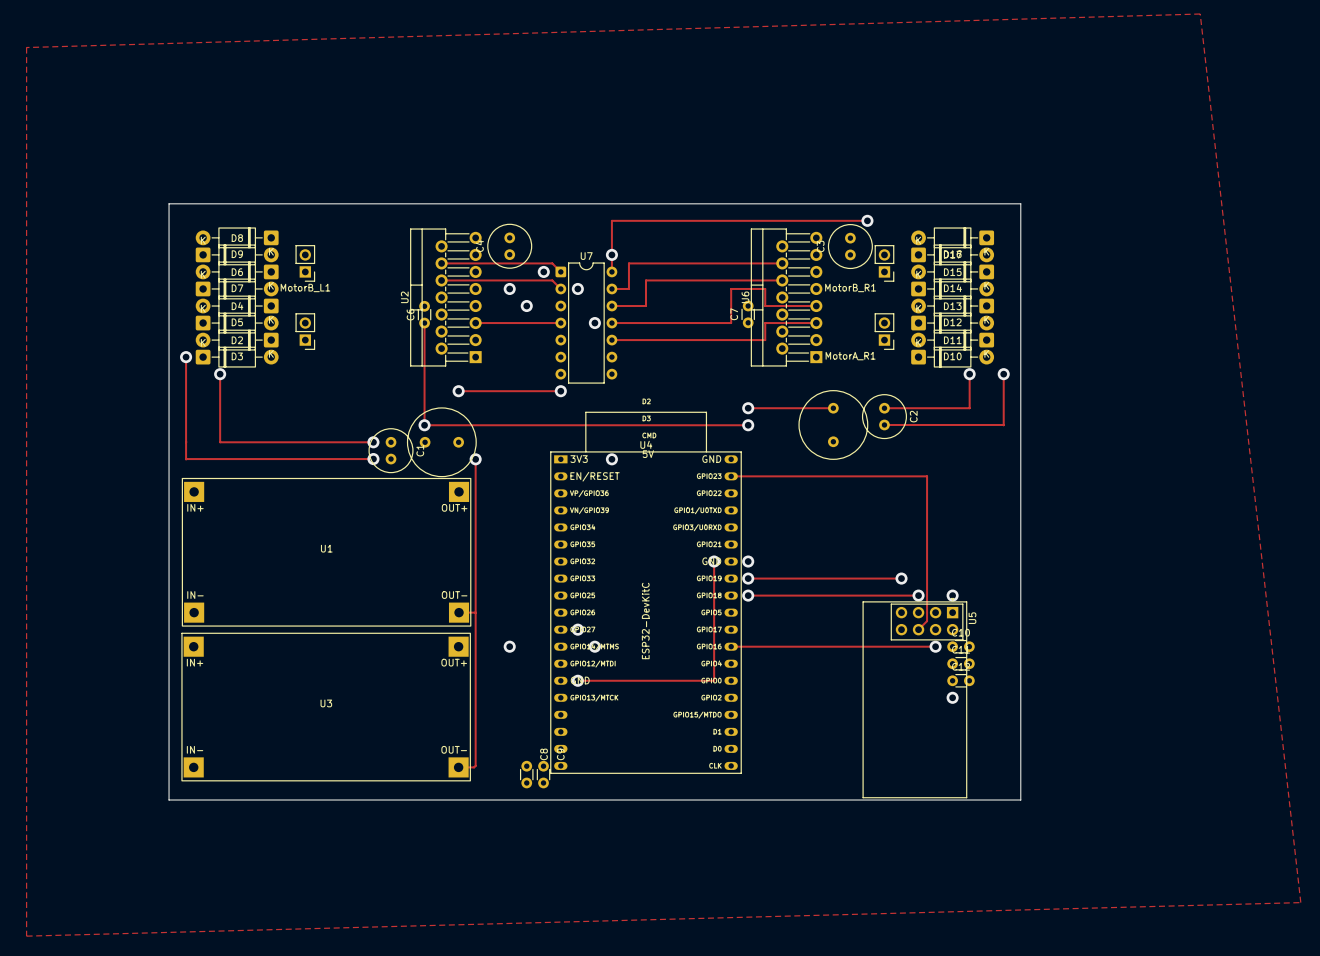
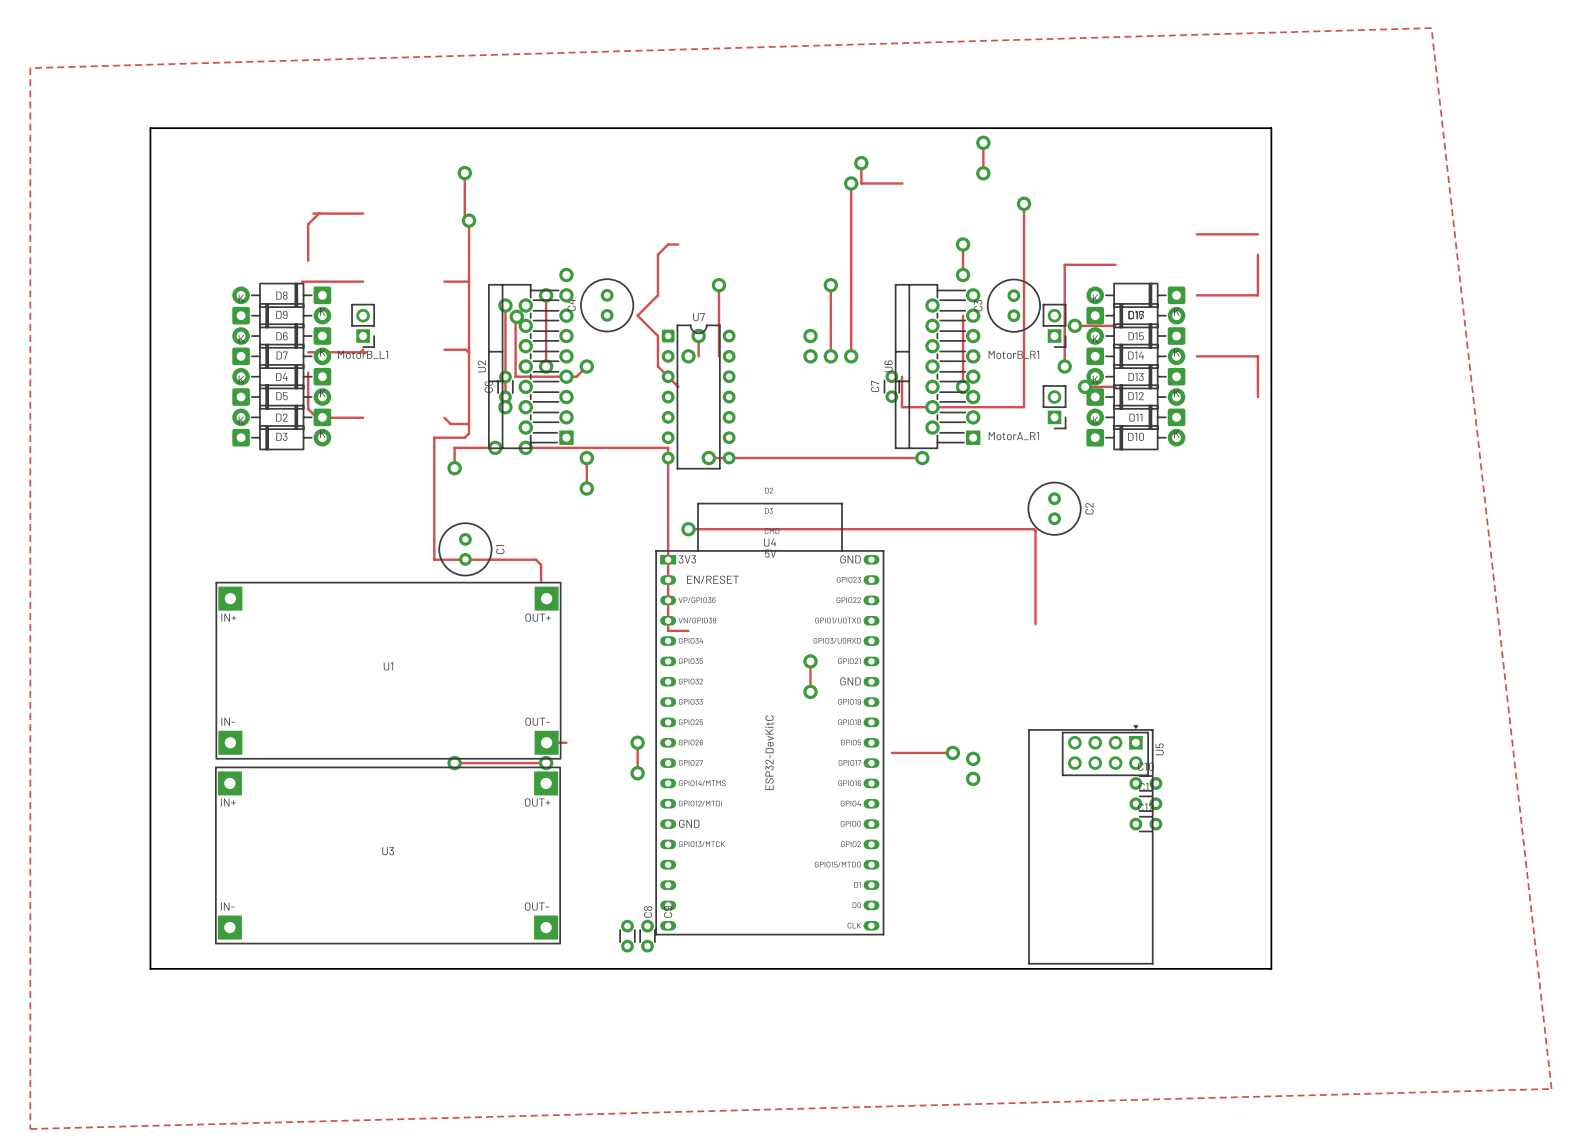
track: none -> (983, 142) (983, 173)
via: none -> (983, 142)
track: none -> (861, 163) (861, 183) (902, 183)
via: none -> (861, 163)
track: none -> (464, 173) (464, 216) (469, 220) (469, 433) (464, 437) (434, 437) (434, 559) (535, 559) (541, 564) (541, 580)
via: none -> (464, 173)
via: none -> (983, 173)
track: none -> (851, 183) (851, 356)
via: none -> (851, 183)
track: none -> (1024, 203) (1024, 407) (902, 407) (902, 376)
via: none -> (1024, 203)
track: none -> (319, 213) (308, 224) (308, 260)
track: none -> (313, 213) (363, 213)
via: none -> (469, 220)
track: none -> (1196, 234) (1257, 234)
track: none -> (678, 244) (668, 244) (657, 254) (657, 295) (637, 315) (657, 336) (657, 366) (678, 386)
track: none -> (963, 244) (963, 275)
via: none -> (963, 244)
board edge: (169, 203) (169, 800) (1020, 800) (1020, 203) (169, 203) -> (150, 128) (150, 968) (1271, 968) (1271, 128) (150, 128)
track: none -> (1257, 254) (1257, 295) (1196, 295)
track: none -> (1115, 264) (1064, 264) (1064, 366)
via: none -> (566, 275)
via: none -> (963, 275)
track: (867, 220) (611, 220) (611, 271) -> none
via: (867, 220) -> none
track: none -> (302, 281) (363, 281)
track: none -> (444, 281) (469, 281)
track: none -> (718, 285) (718, 356)
via: none -> (718, 285)
track: none -> (830, 285) (830, 356)
via: none -> (830, 285)
track: none -> (546, 295) (546, 366)
via: none -> (546, 295)
track: none -> (505, 305) (505, 397)
via: none -> (505, 305)
via: (611, 254) -> none
track: none -> (963, 315) (963, 386)
track: none -> (516, 316) (515, 376) (576, 376) (586, 366)
via: none -> (516, 316)
track: (441, 263) (552, 263) (560, 271) -> none
track: (782, 263) (628, 263) (628, 288) (611, 288) -> none
track: none -> (1074, 325) (1115, 325)
via: none -> (1074, 325)
via: (543, 271) -> none
track: none -> (698, 336) (698, 356)
via: none -> (698, 336)
via: none -> (810, 336)
track: (441, 280) (552, 280) (560, 288) -> none
track: (782, 280) (645, 280) (645, 306) (611, 306) -> none
track: none -> (363, 349) (359, 352)
track: none -> (444, 349) (465, 349) (469, 352)
track: none -> (308, 352) (366, 352)
via: (509, 288) -> none
via: none -> (810, 356)
via: none -> (830, 356)
via: none -> (851, 356)
track: none -> (1196, 356) (1257, 356) (1257, 397)
via: none -> (546, 366)
via: none -> (586, 366)
via: none -> (1064, 366)
track: none -> (308, 372) (308, 409) (316, 417) (363, 417)
via: (526, 306) -> none
track: (816, 306) (765, 306) (765, 288) (731, 288) (731, 323) (611, 323) -> none
via: none -> (963, 386)
track: none -> (1085, 386) (1115, 386)
via: none -> (1085, 386)
track: (475, 323) (560, 323) -> none
via: (594, 323) -> none
track: (816, 323) (765, 323) (765, 340) (611, 340) -> none
part: (305, 331) -> none
track: (424, 331) (424, 425) (748, 425) -> none
via: none -> (505, 407)
track: none -> (444, 417) (450, 424) (469, 424)
track: (186, 357) (186, 459) (373, 459) -> none
via: (186, 357) -> none
track: none -> (495, 447) (454, 447) (454, 468)
via: none -> (495, 447)
track: none -> (525, 447) (668, 447) (668, 630) (688, 630)
via: none -> (525, 447)
track: (220, 374) (220, 442) (373, 442) -> none
via: (220, 374) -> none
track: none -> (586, 458) (586, 488)
via: none -> (586, 458)
track: none -> (708, 458) (922, 458)
via: none -> (708, 458)
via: none -> (922, 458)
track: (969, 374) (969, 408) (884, 408) -> none
via: (969, 374) -> none
track: (1003, 374) (1003, 425) (884, 424) -> none
via: (1003, 374) -> none
via: none -> (454, 468)
track: (458, 391) (560, 391) -> none
via: (458, 391) -> none
via: (560, 391) -> none
via: none -> (586, 488)
track: (748, 408) (833, 408) -> none
via: (748, 408) -> none
part: (833, 424) -> none
via: (424, 425) -> none
via: (748, 425) -> none
track: none -> (688, 529) (1034, 529) (1035, 624)
via: none -> (688, 529)
via: (373, 442) -> none
part: (441, 442) -> none
via: (373, 459) -> none
track: (475, 459) (475, 765) (458, 767) -> none
via: (475, 459) -> none
via: (611, 459) -> none
track: (731, 476) (927, 476) (927, 621) (918, 629) -> none
track: none -> (810, 661) (810, 691)
via: none -> (810, 661)
track: (714, 561) (714, 680) (577, 680) -> none
via: (714, 561) -> none
via: (748, 561) -> none
via: none -> (810, 691)
track: (748, 578) (901, 578) -> none
via: (748, 578) -> none
via: (901, 578) -> none
track: (748, 595) (918, 595) -> none
via: (748, 595) -> none
via: (918, 595) -> none
via: (952, 595) -> none
track: none -> (637, 742) (637, 773)
via: none -> (637, 742)
track: none -> (891, 752) (952, 752)
via: none -> (952, 752)
via: none -> (973, 758)
track: none -> (454, 763) (546, 763)
via: none -> (454, 763)
via: none -> (546, 763)
via: (577, 629) -> none
via: none -> (637, 773)
via: none -> (973, 778)
via: (509, 646) -> none
via: (594, 646) -> none
track: (731, 646) (935, 646) -> none
via: (935, 646) -> none
via: (577, 680) -> none
via: (952, 697) -> none

